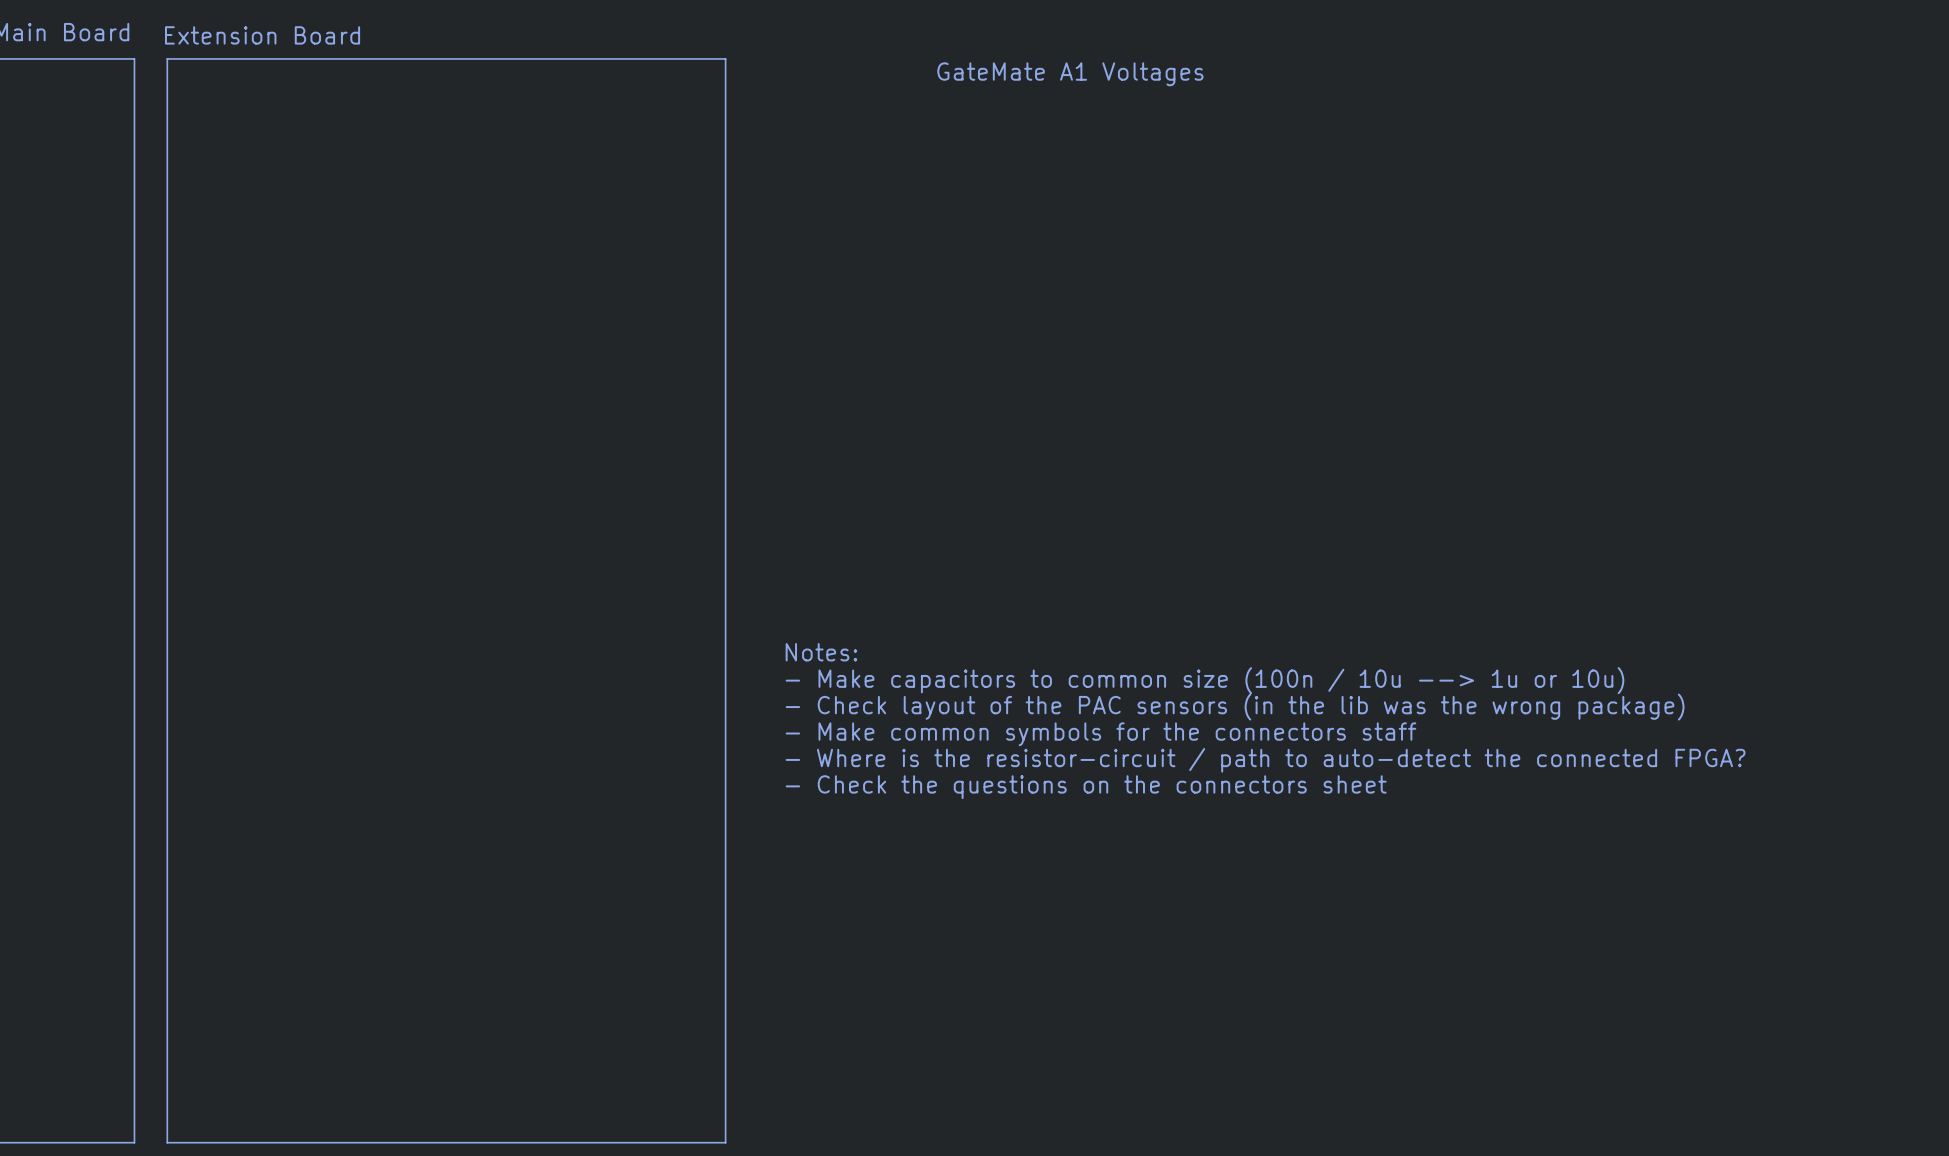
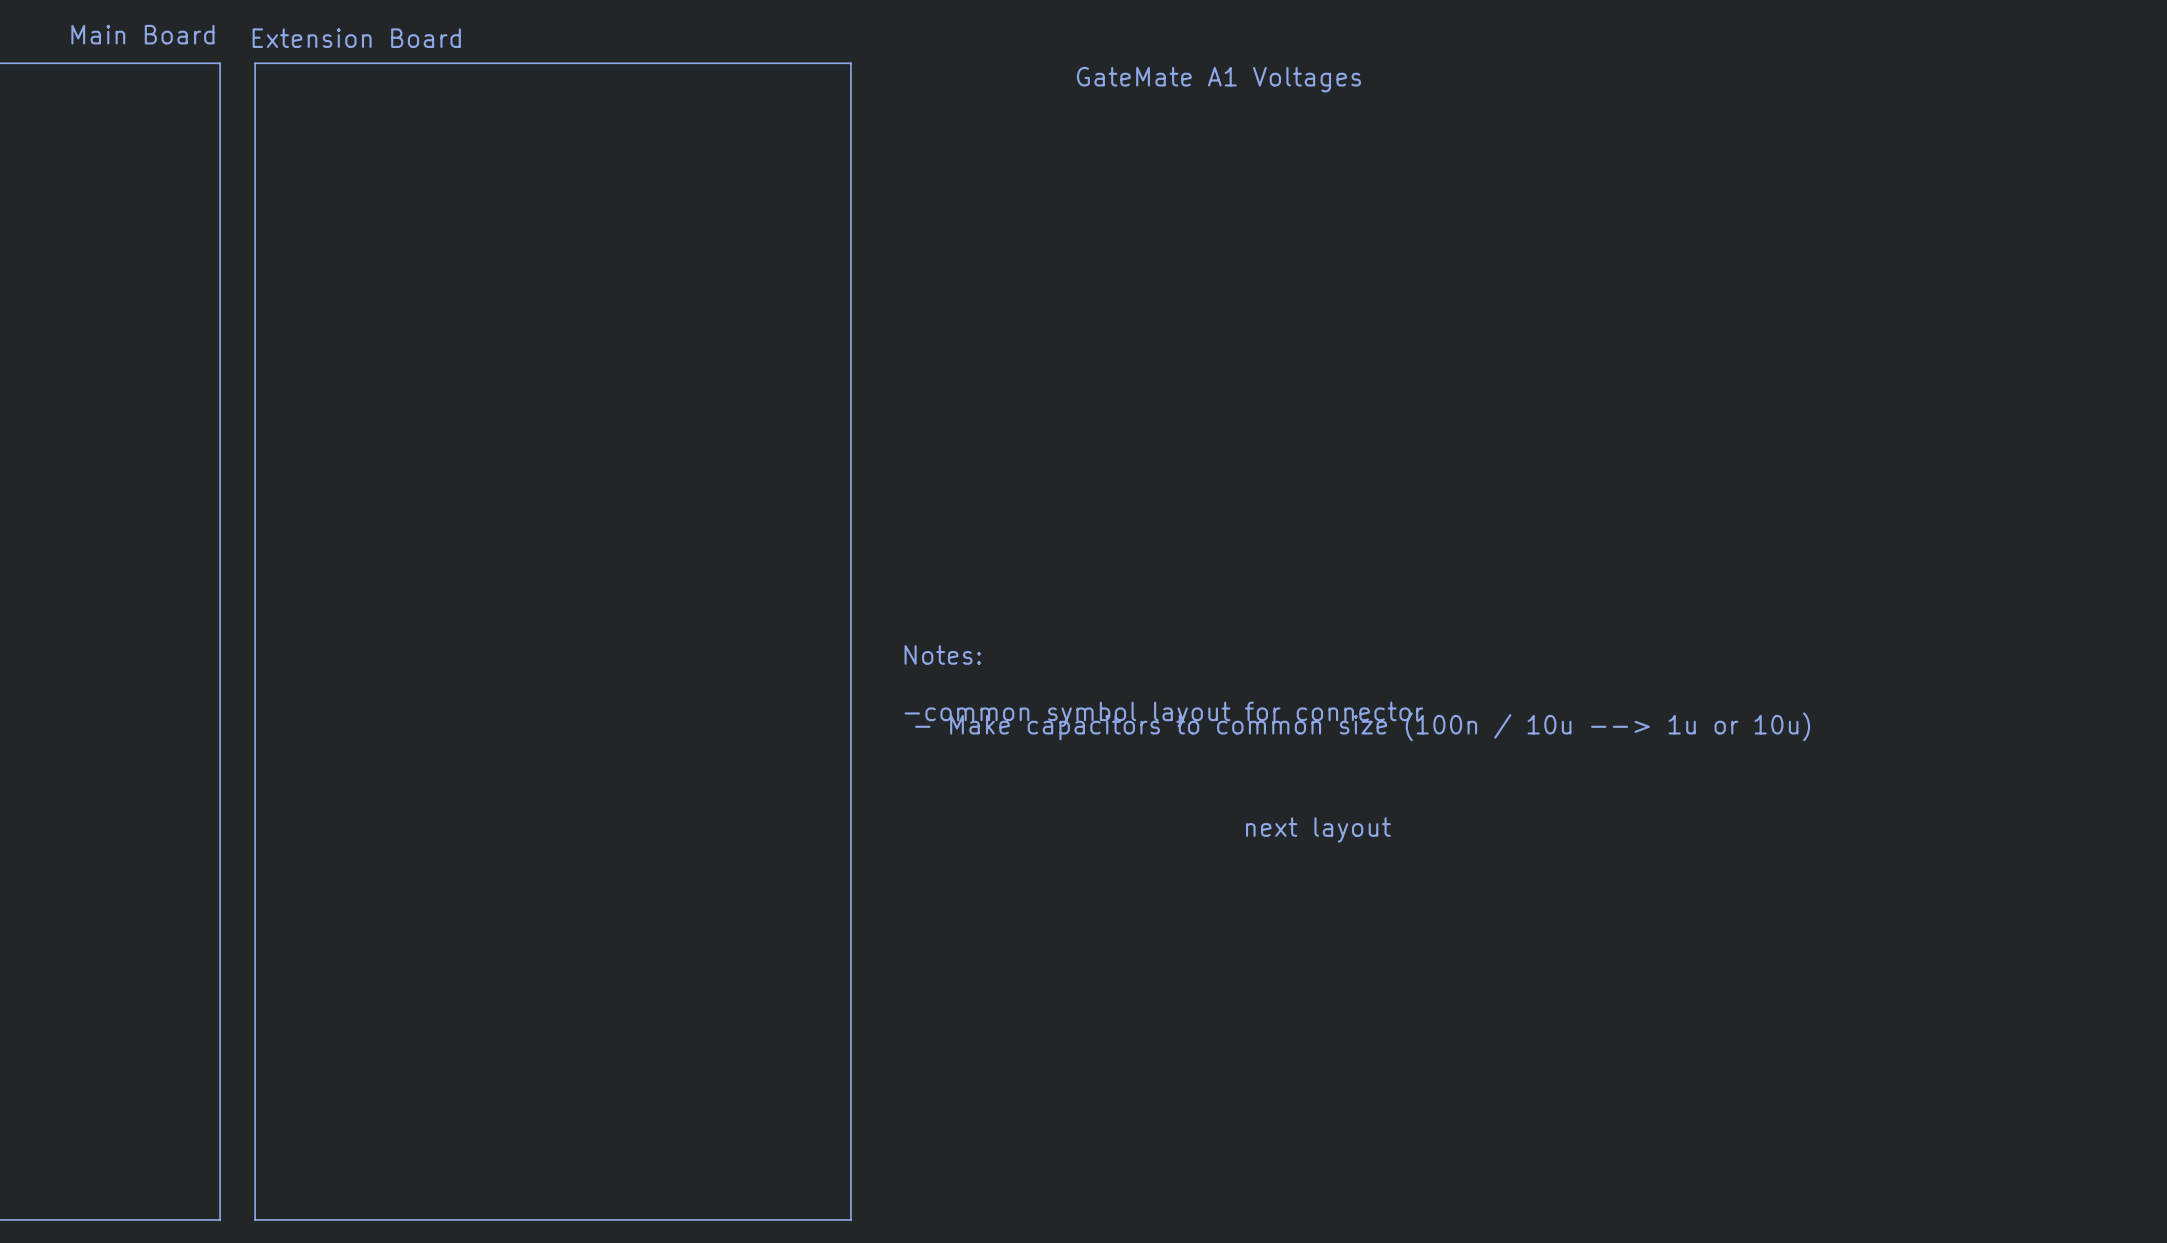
text position: Notes: (821, 652) -> Notes: (942, 654)
text: none -> -common symbol layout for connector (1163, 714)
text: - Check layout of the PAC sensors (in the lib was the wrong package) (1235, 707) -> none
text: - Make common symbols for the connectors staff (1100, 734) -> none
text: - Where is the resistor-circuit / path to auto-detect the connected FPGA? (1265, 760) -> none
text: none -> next layout (1318, 829)
text: - Check the questions on the connectors sheet (1086, 787) -> none

